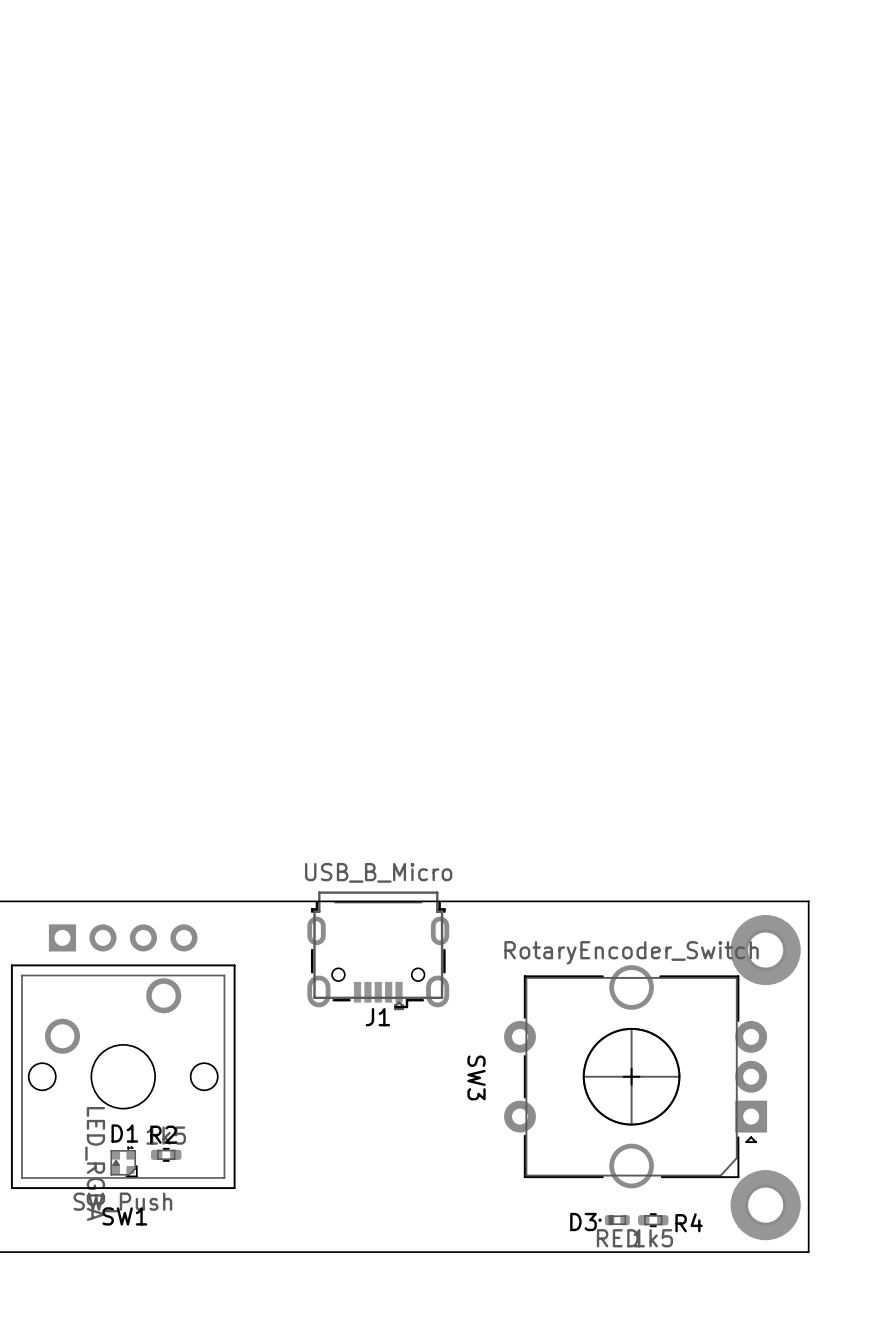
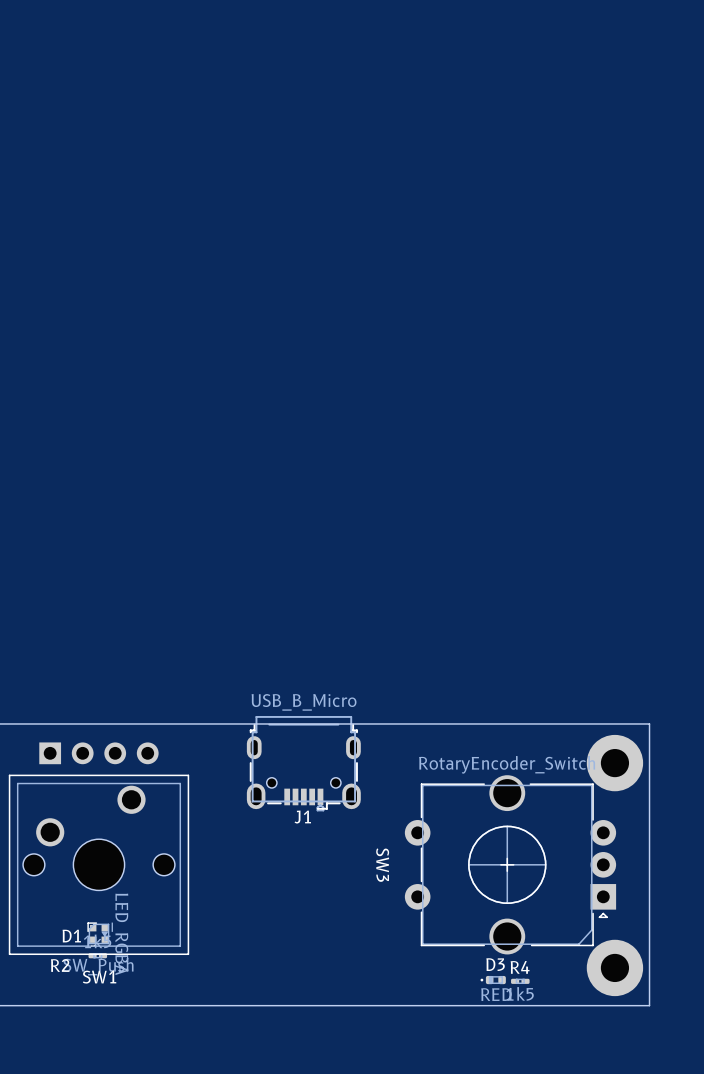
D1 name position: D1 (124, 1133) -> D1 (71, 936)
R2 name position: R2 (163, 1134) -> R2 (60, 965)
R2 footprint: [151, 1147, 182, 1162] -> [88, 953, 108, 959]
D1 rotation: 0° (124, 1163) -> 180° (98, 933)
R4 footprint: [638, 1213, 669, 1228] -> [511, 978, 530, 984]
D3 name position: D3 (583, 1221) -> D3 (495, 964)
R4 name position: R4 (689, 1222) -> R4 (520, 967)

